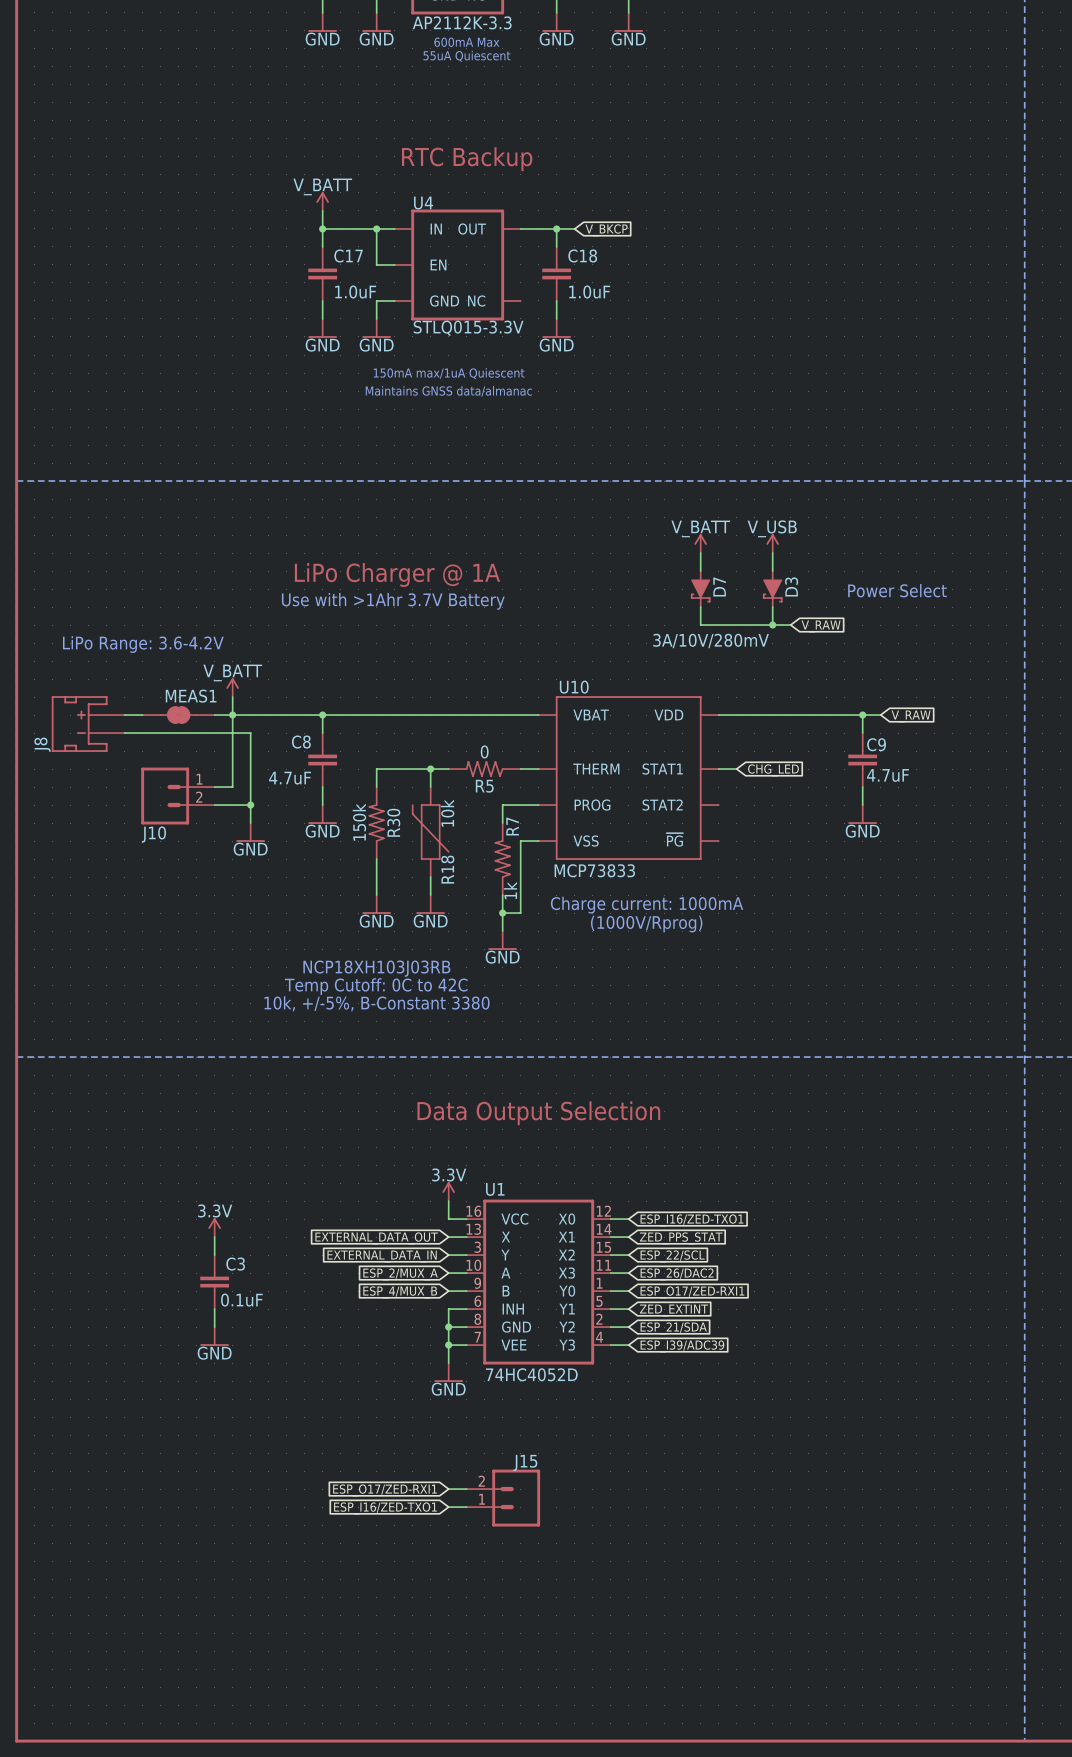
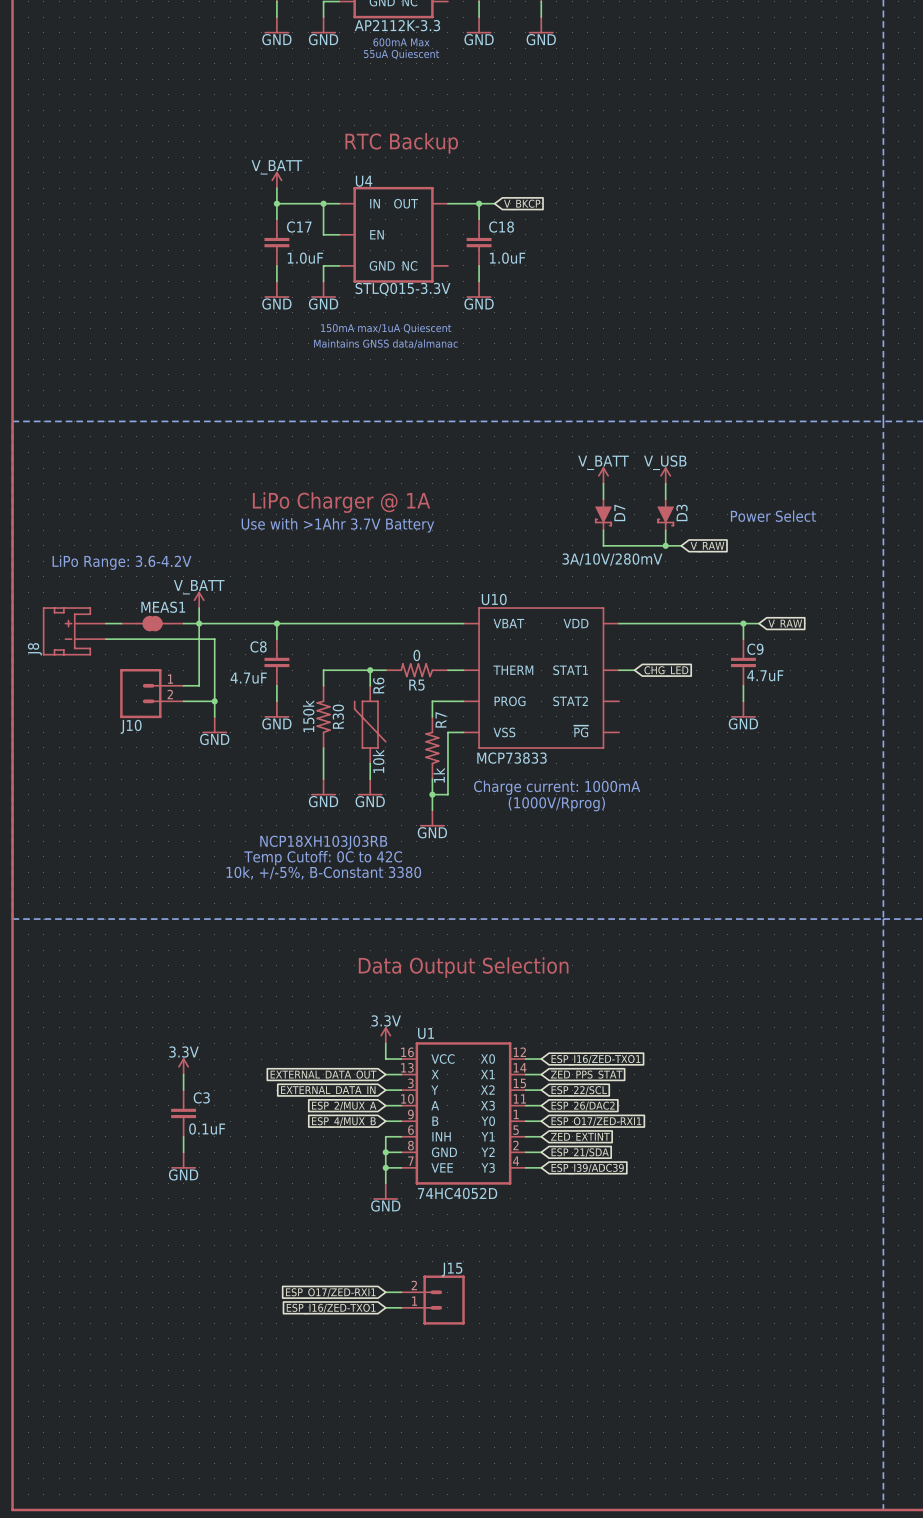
R18 value position: 10k (447, 813) -> 10k (378, 761)
R18 name: R18 (447, 869) -> R6 (378, 685)

